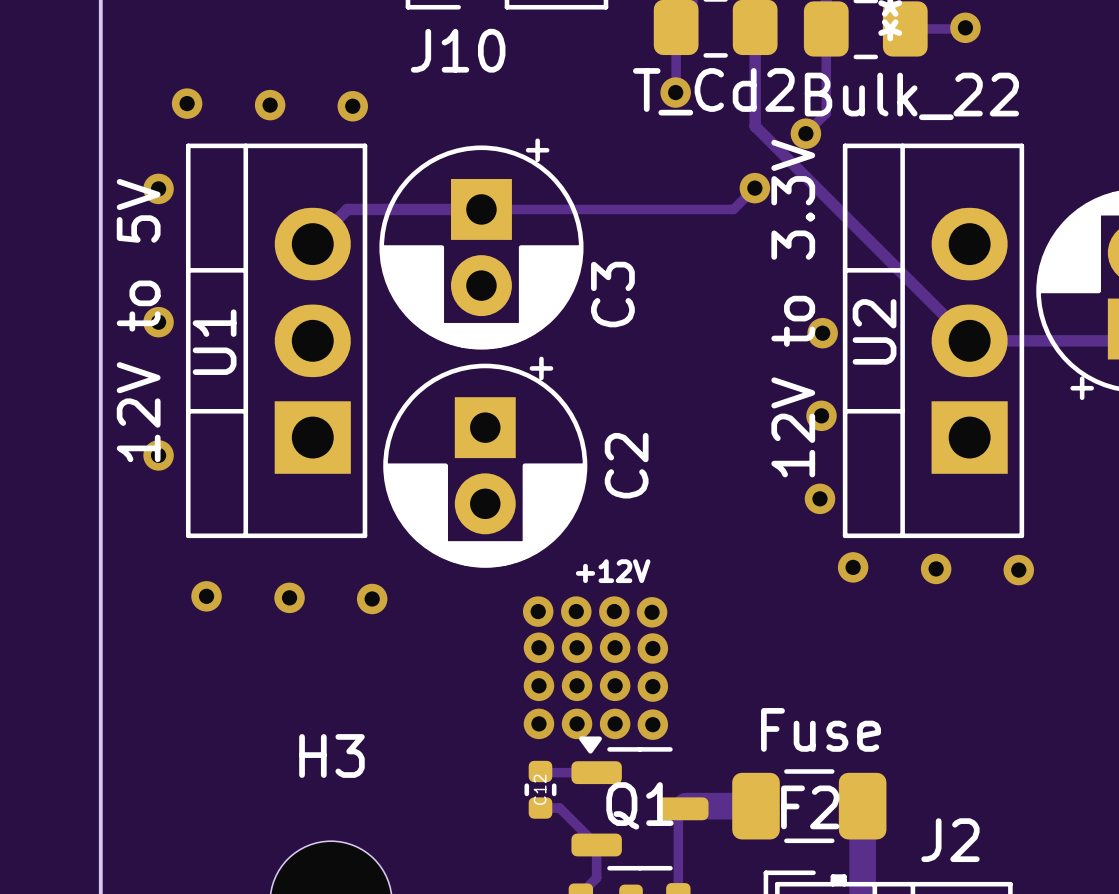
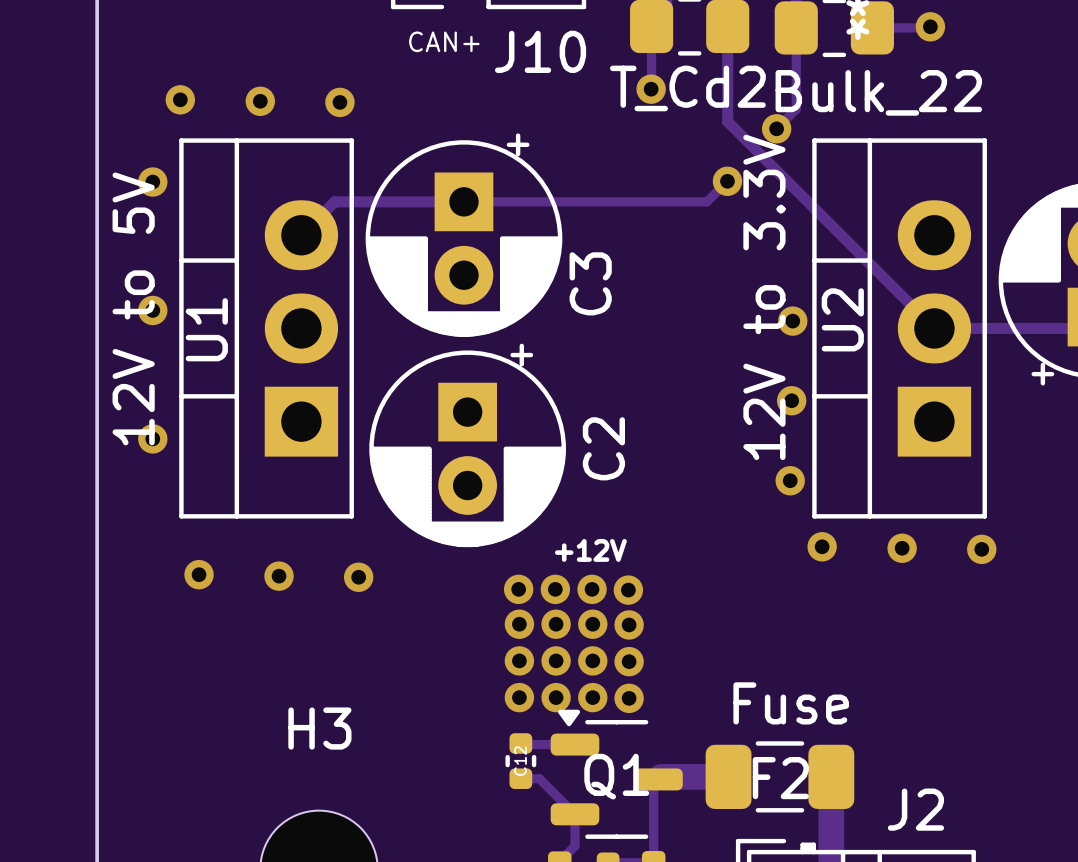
text: none -> CAN+ (444, 41)
J10 name position: J10 (458, 50) -> J10 (540, 51)

